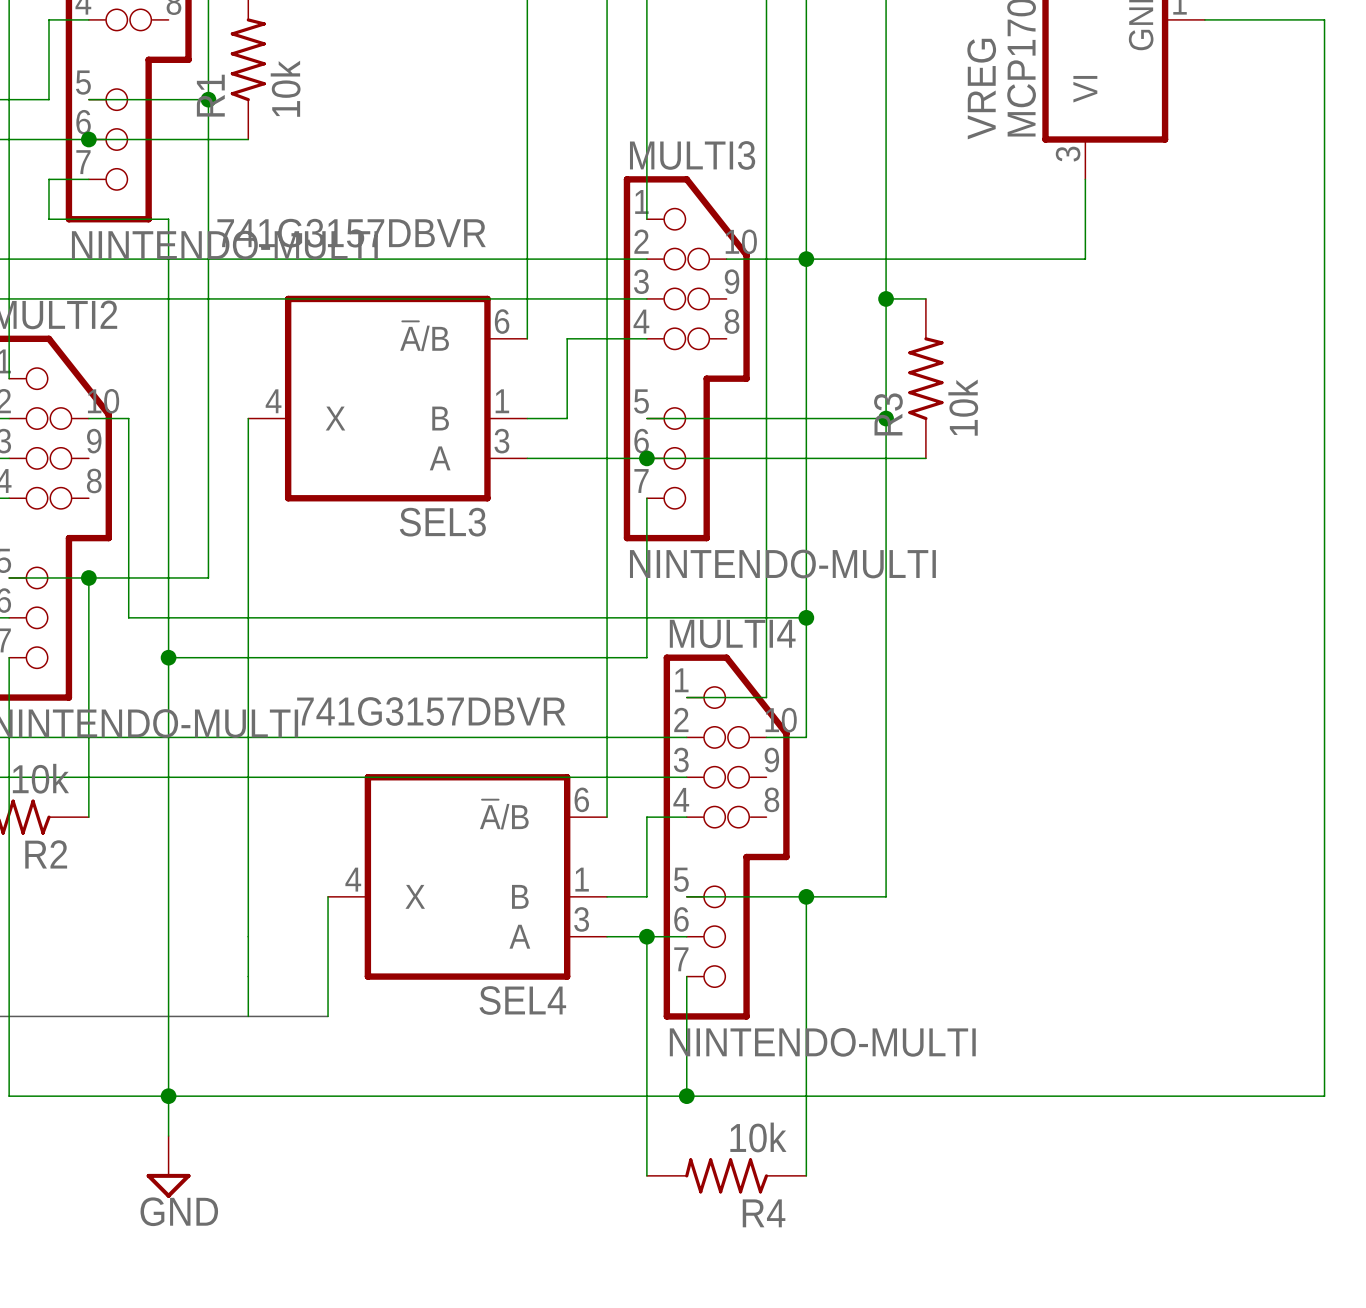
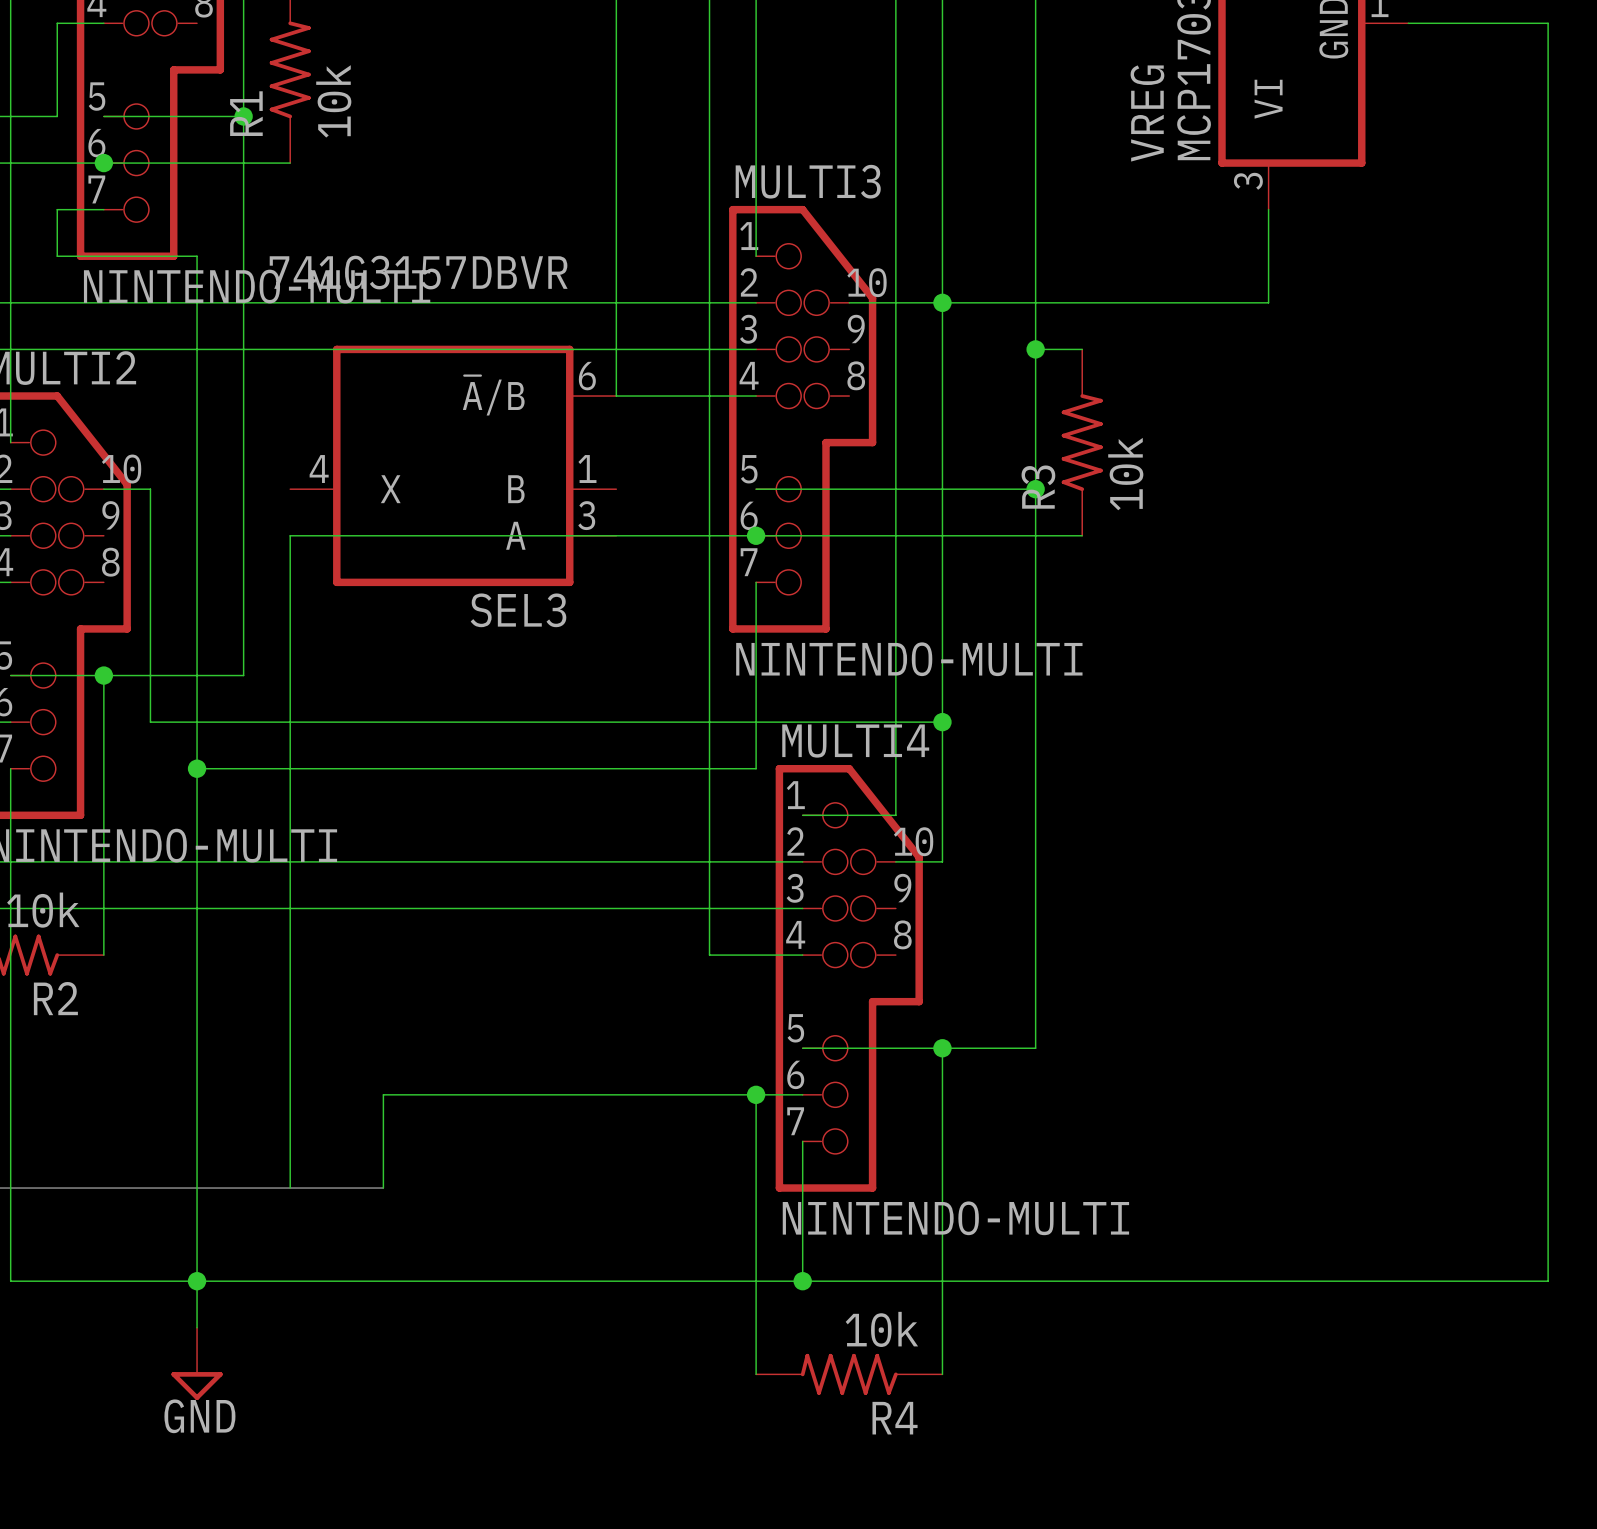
wire: (567, 338) (567, 418) (527, 418) -> (662, 396) (616, 396)
wire: (248, 418) (248, 458) -> (616, 535) (290, 535)
wire: (646, 817) (646, 896) (607, 896) -> (756, 955) (709, 955)
SEL4: 741G3157DBVR (467, 876) -> none
wire: (328, 896) (328, 936) -> (709, 1094) (383, 1094)

